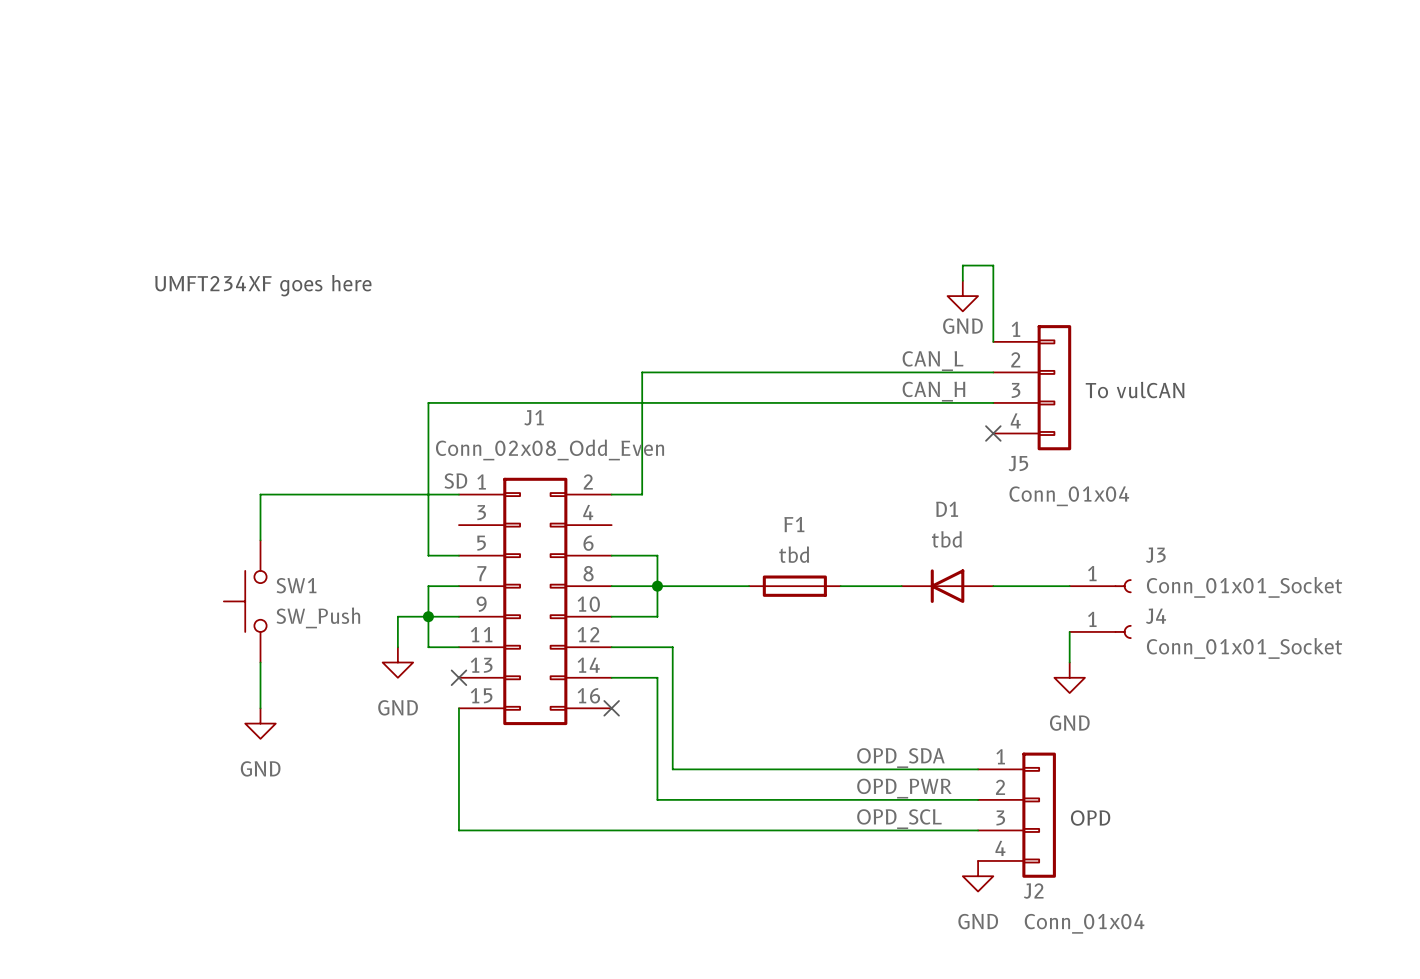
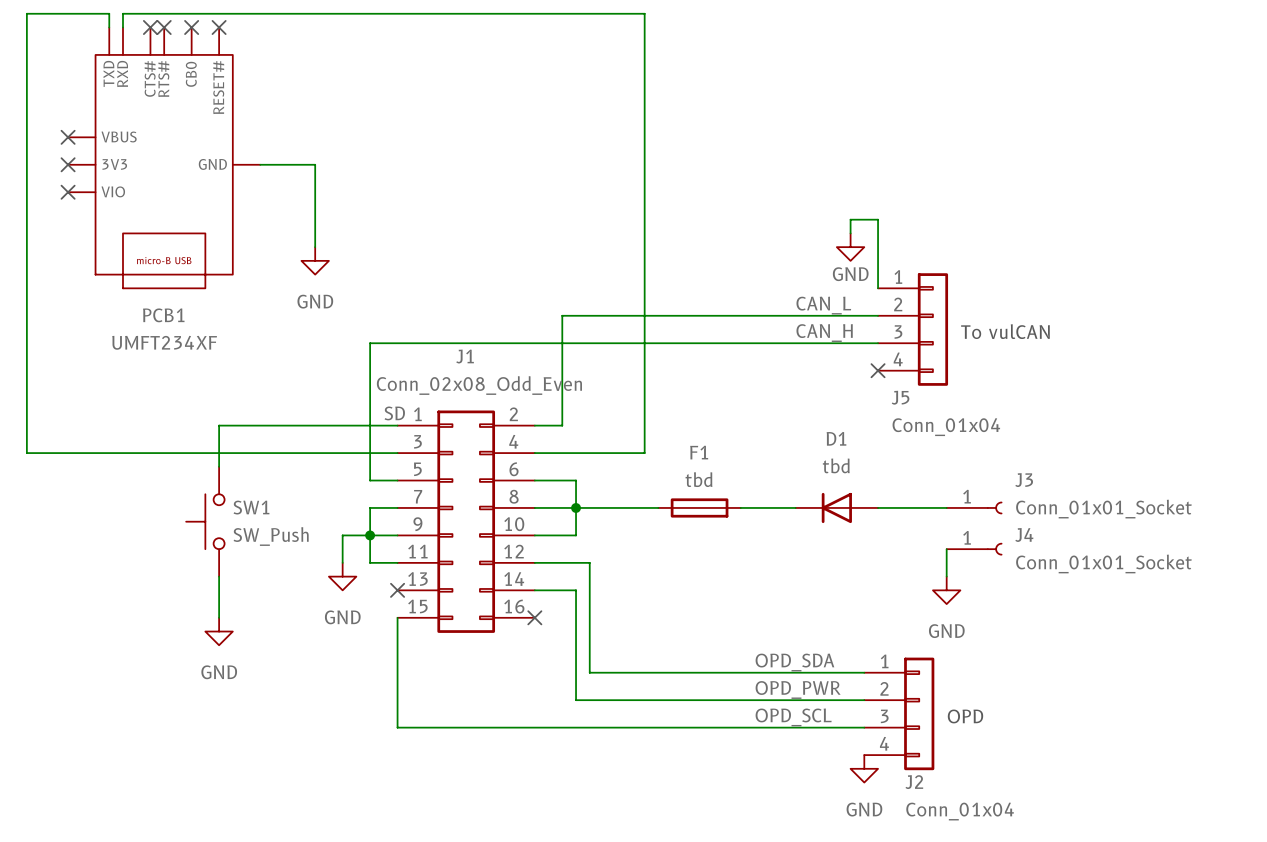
wire: none -> (109, 27) (109, 13) (26, 13) (26, 453) (397, 453)
wire: none -> (122, 27) (122, 13) (644, 13) (644, 453) (534, 453)
no-connect mark: none -> (150, 27)
no-connect mark: none -> (164, 27)
no-connect mark: none -> (191, 27)
no-connect mark: none -> (219, 27)
no-connect mark: none -> (68, 137)
PCB1: none -> UMFT234XF (164, 157)
no-connect mark: none -> (68, 164)
wire: none -> (260, 164) (315, 164) (315, 247)
no-connect mark: none -> (68, 192)
text: UMFT234XF goes here (263, 285) -> none
power symbol: none -> GND (315, 260)

